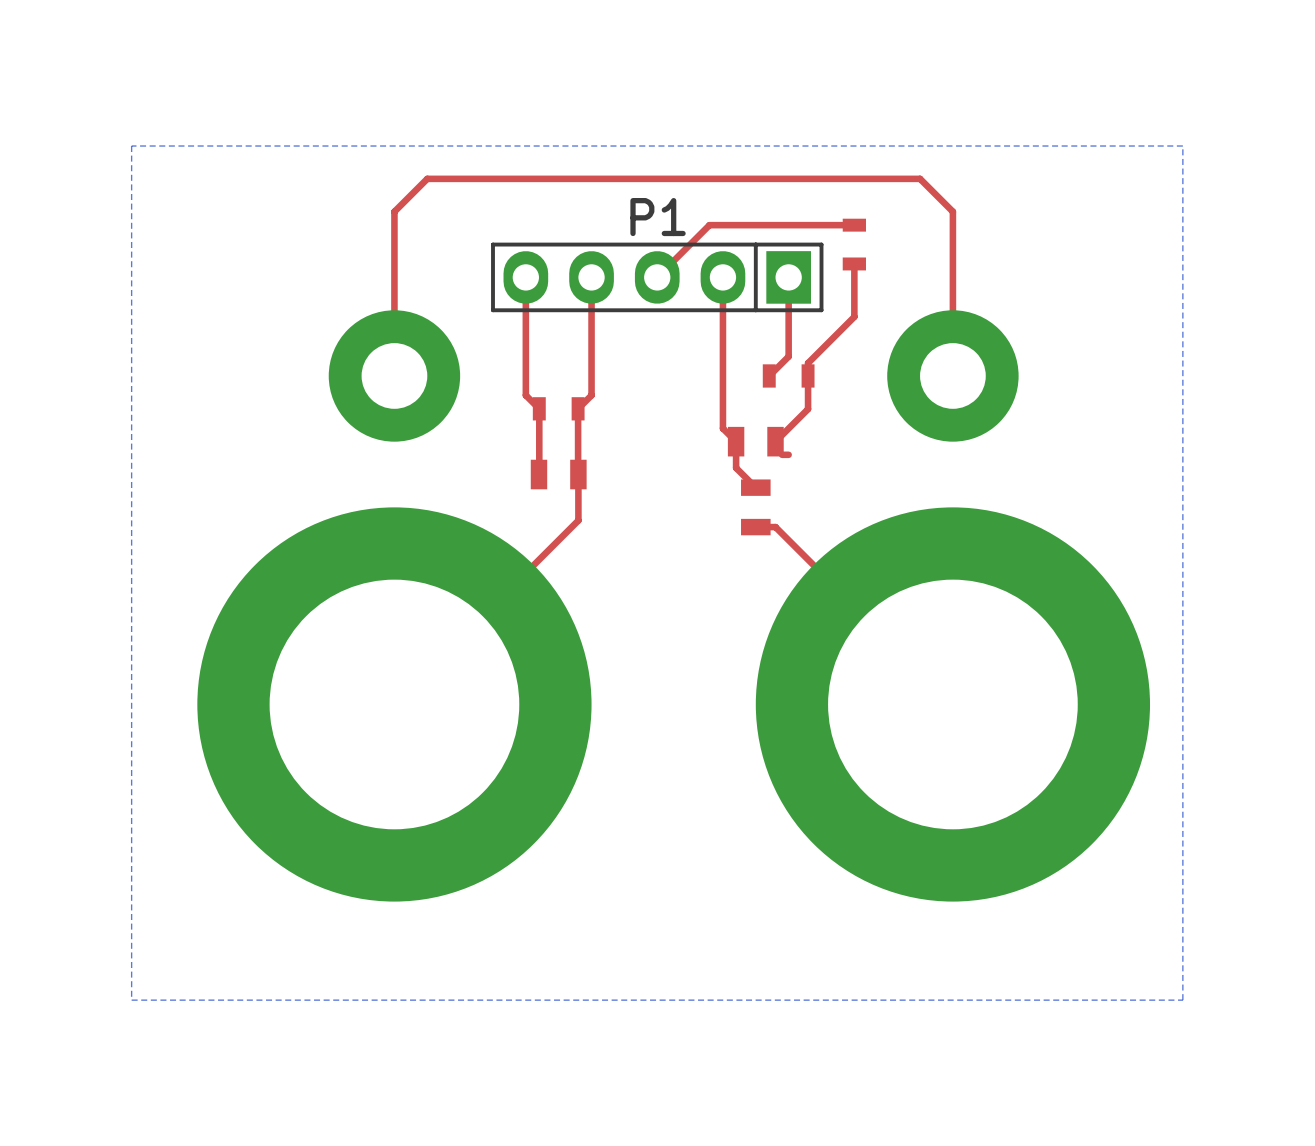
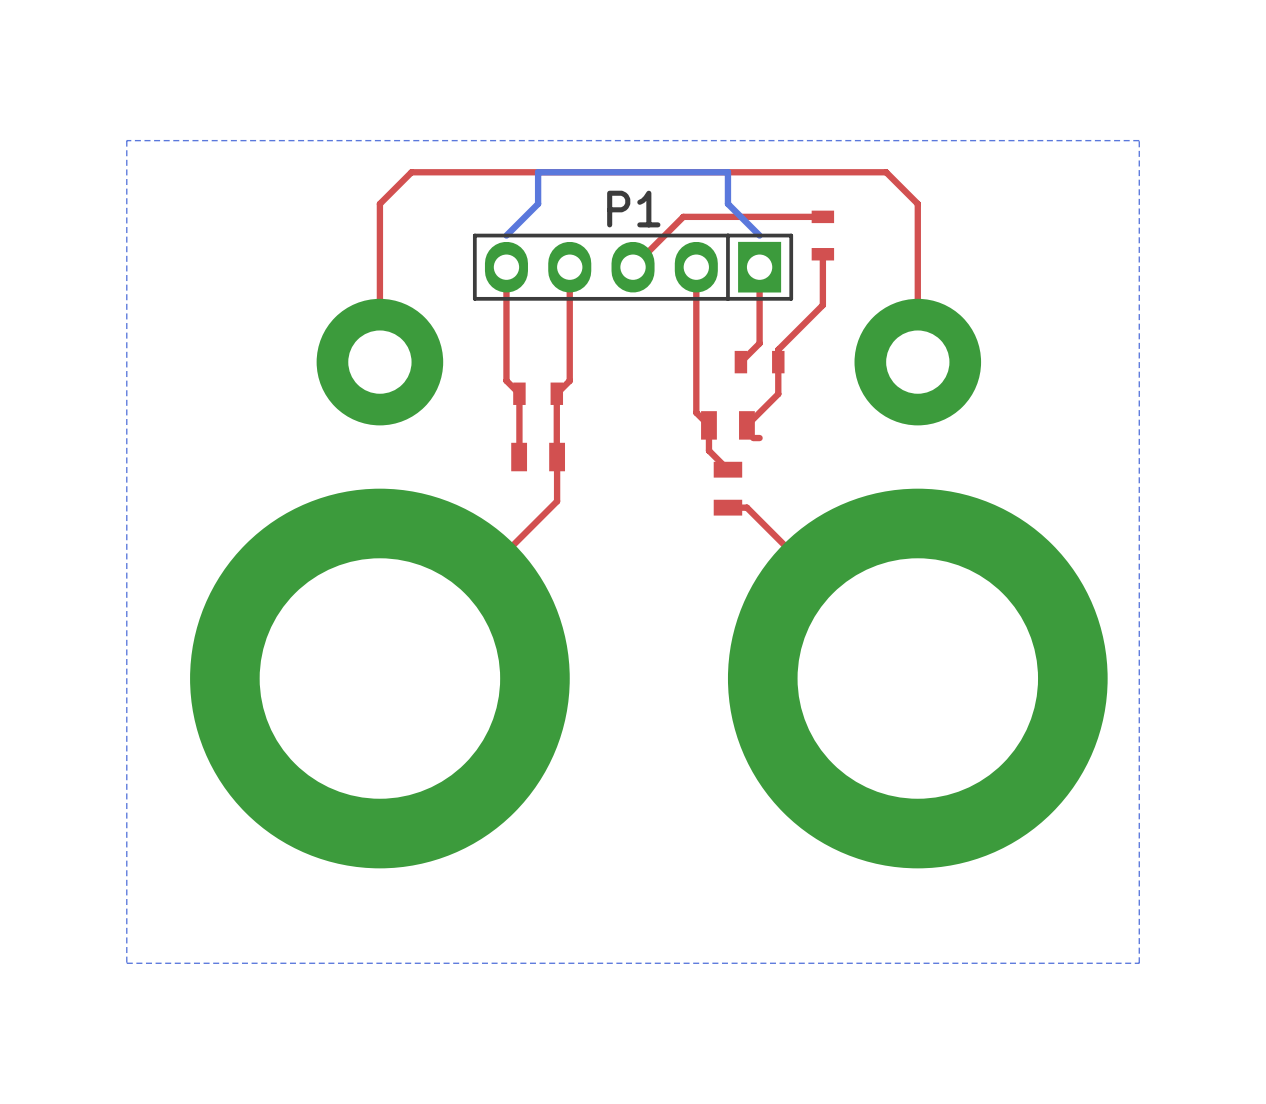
bottom track: none -> (759, 235) (727, 203) (727, 172) (538, 172) (538, 203) (506, 235)

